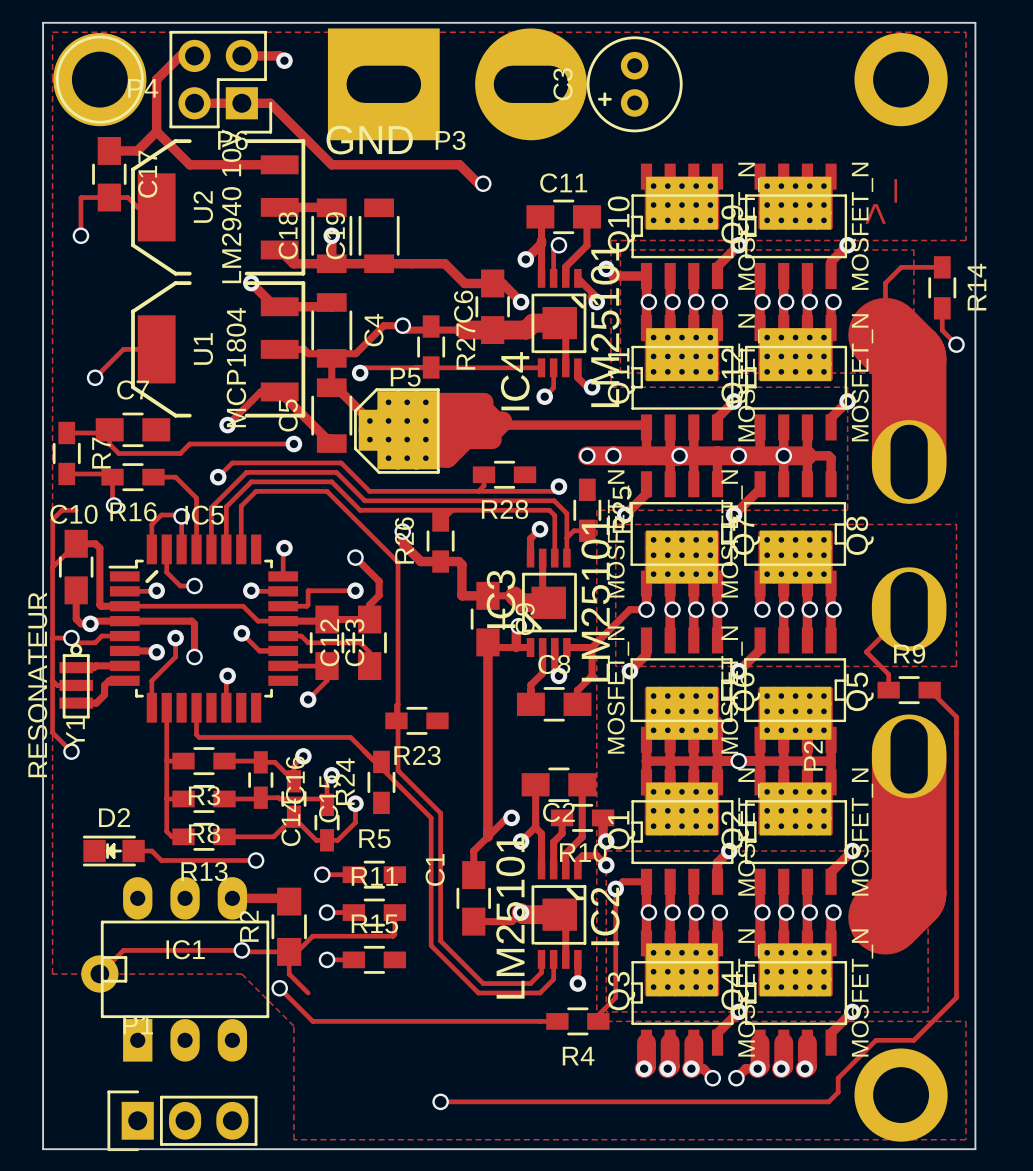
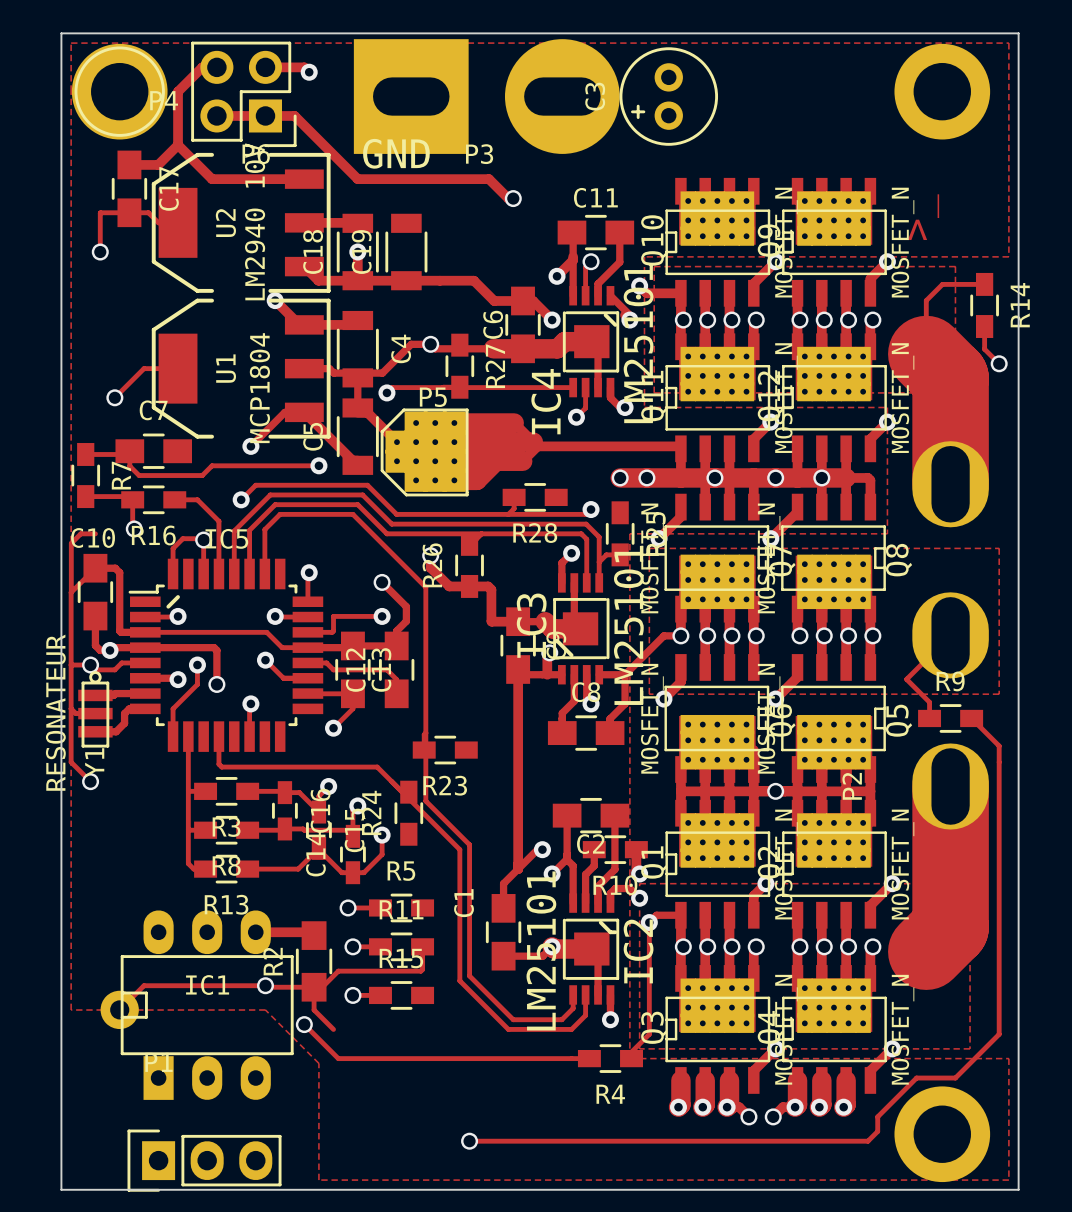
track: (166, 549) (166, 572) (180, 586) (194, 586) -> none
via: (194, 586) -> none
D2: (113, 851) -> none
track: (133, 851) (151, 851) (161, 860) (256, 860) -> none
via: (256, 860) -> none

